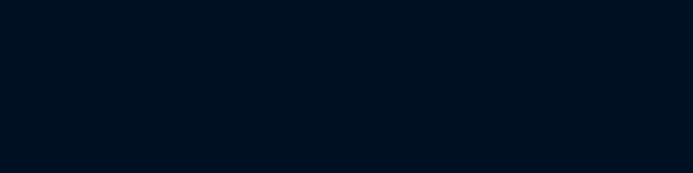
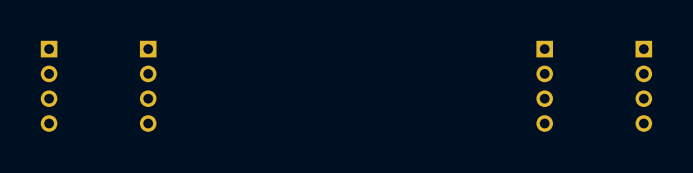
part: none -> (49, 86)
part: none -> (148, 86)
part: none -> (544, 86)
part: none -> (643, 86)

